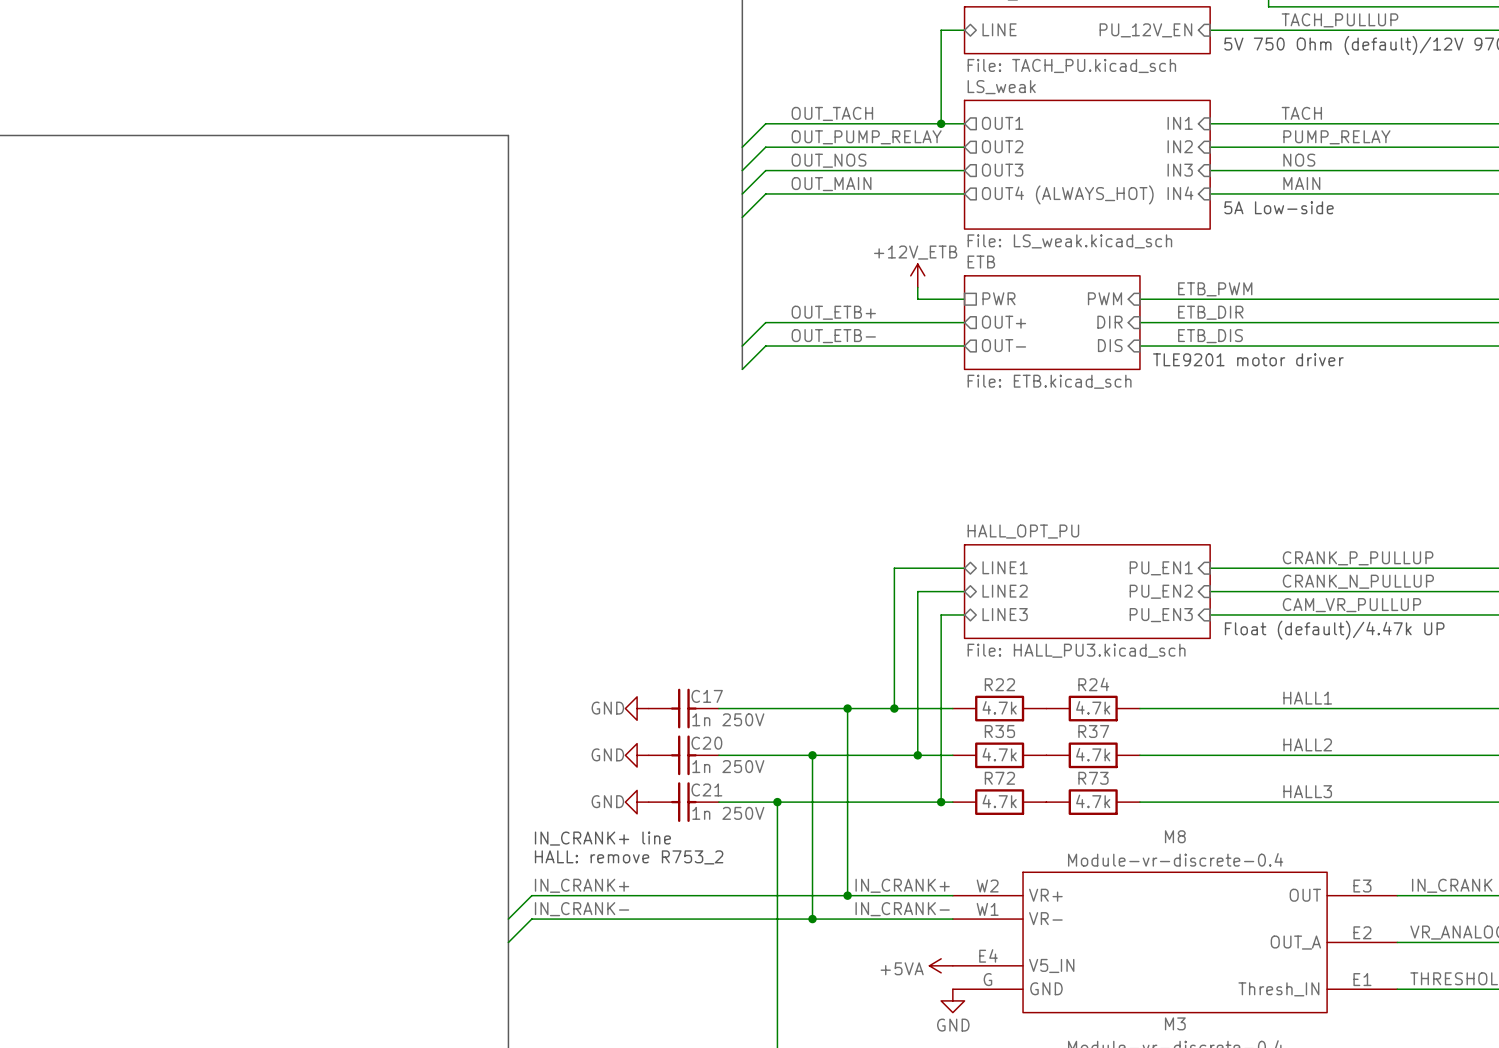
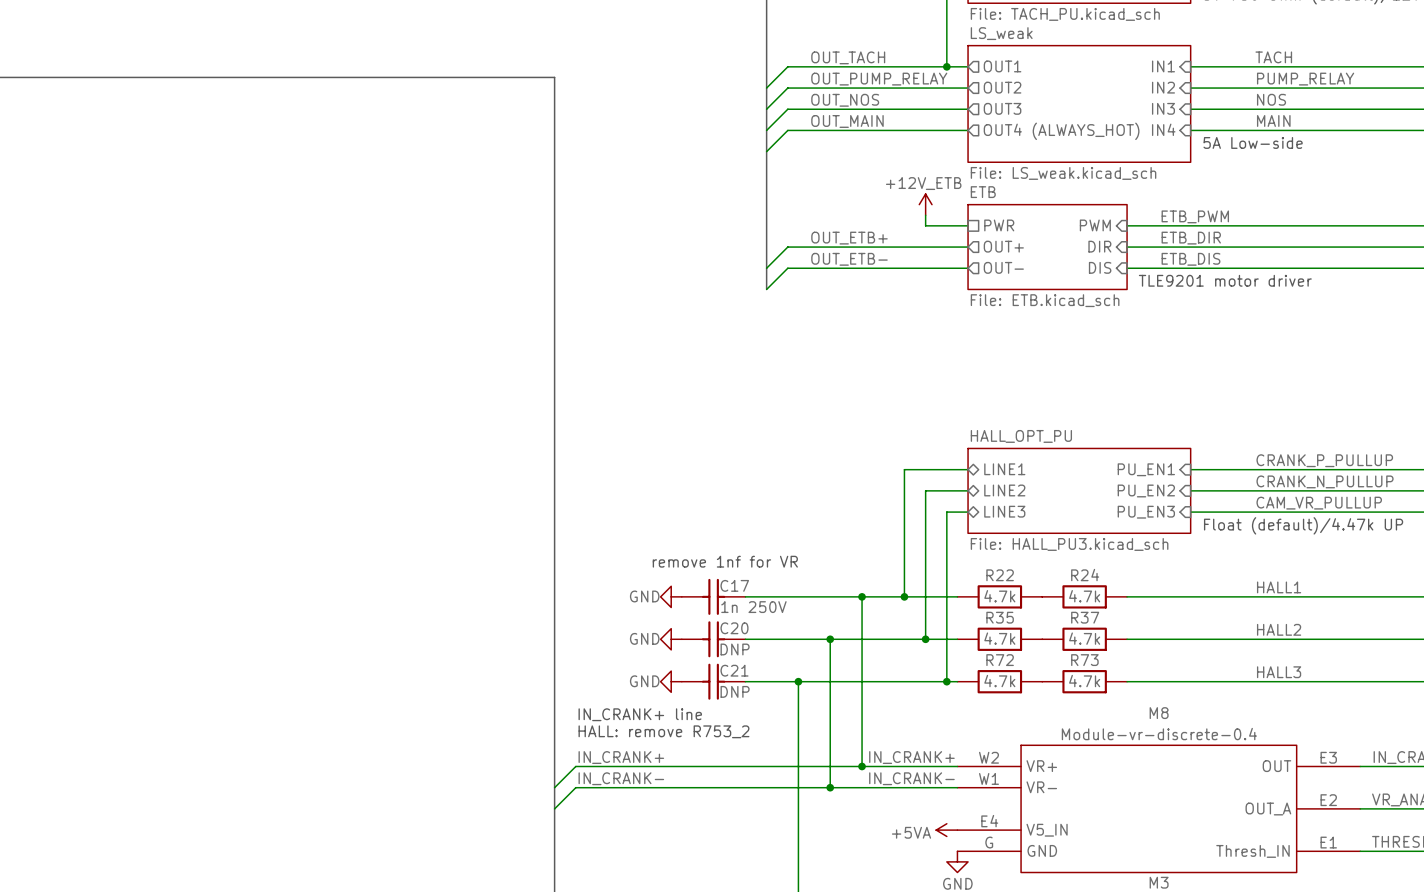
text: none -> remove 1nf for VR (725, 561)
C20 text: none -> DNP (735, 649)
C20 value: 1n 250V (728, 766) -> none
C21 text: none -> DNP (735, 691)
C21 value: 1n 250V (728, 813) -> none

